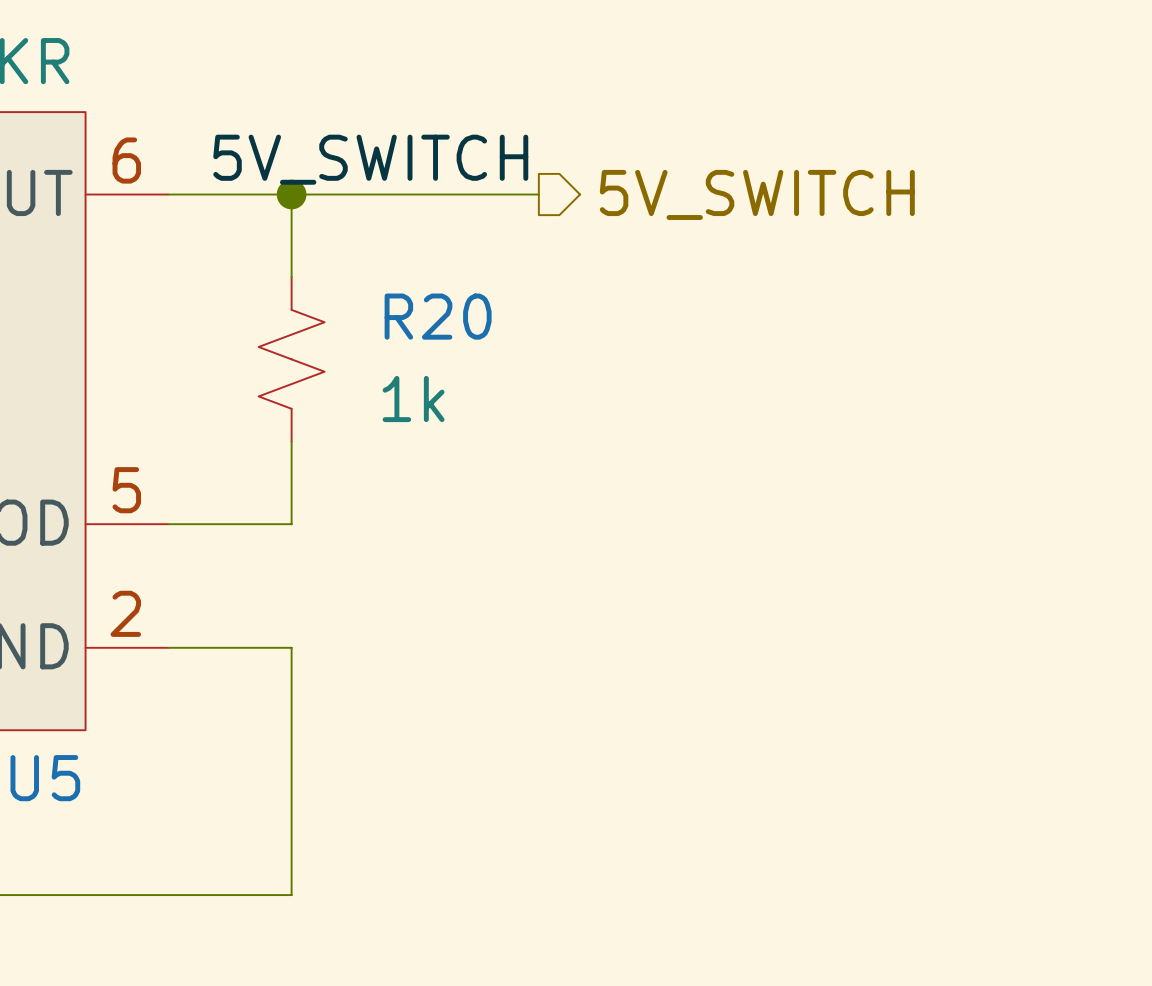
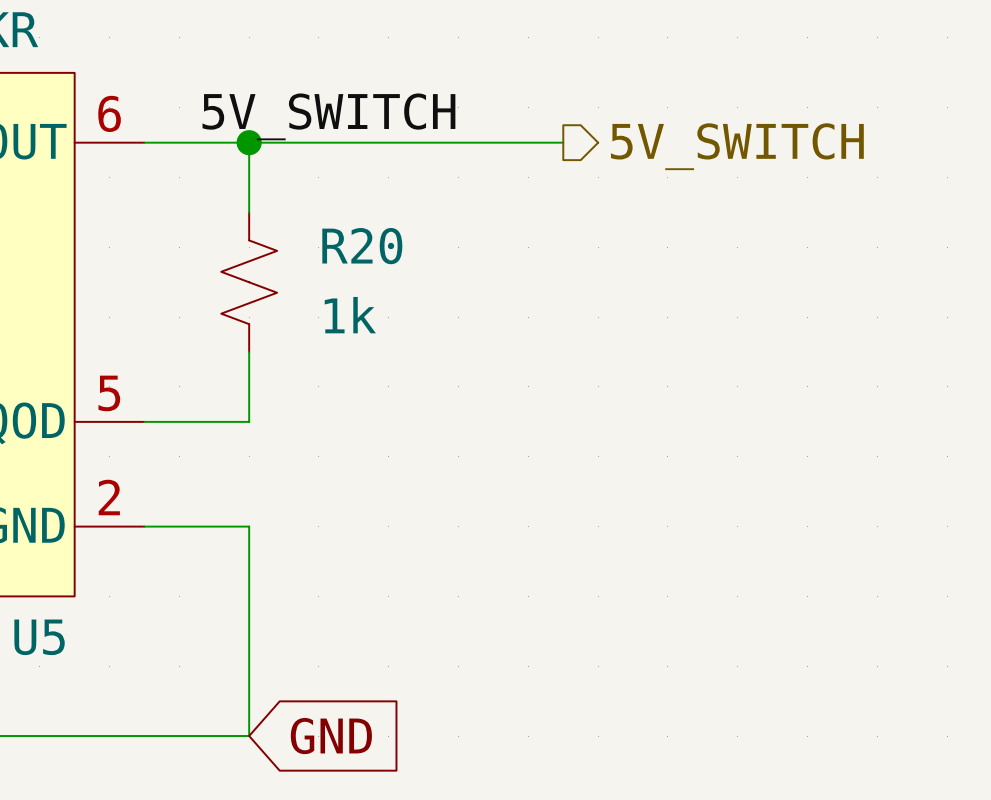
wire: none -> (458, 142) (563, 142)
hierarchical label position: 5V_SWITCH (757, 194) -> 5V_SWITCH (737, 146)
global label: none -> GND (331, 736)

